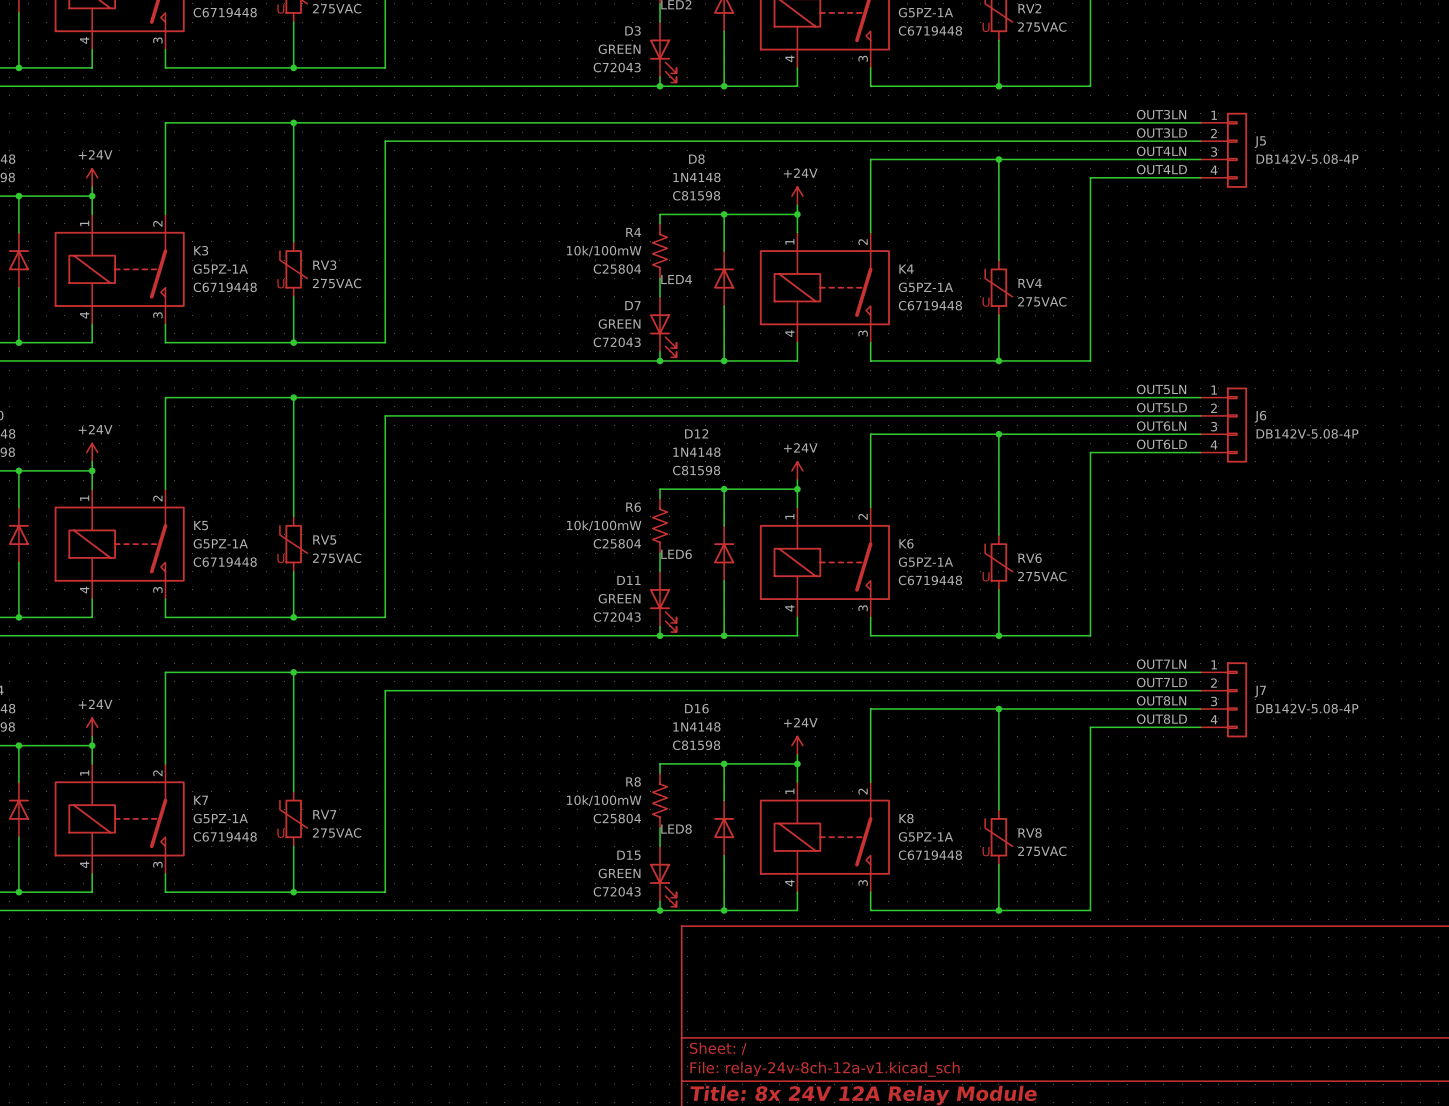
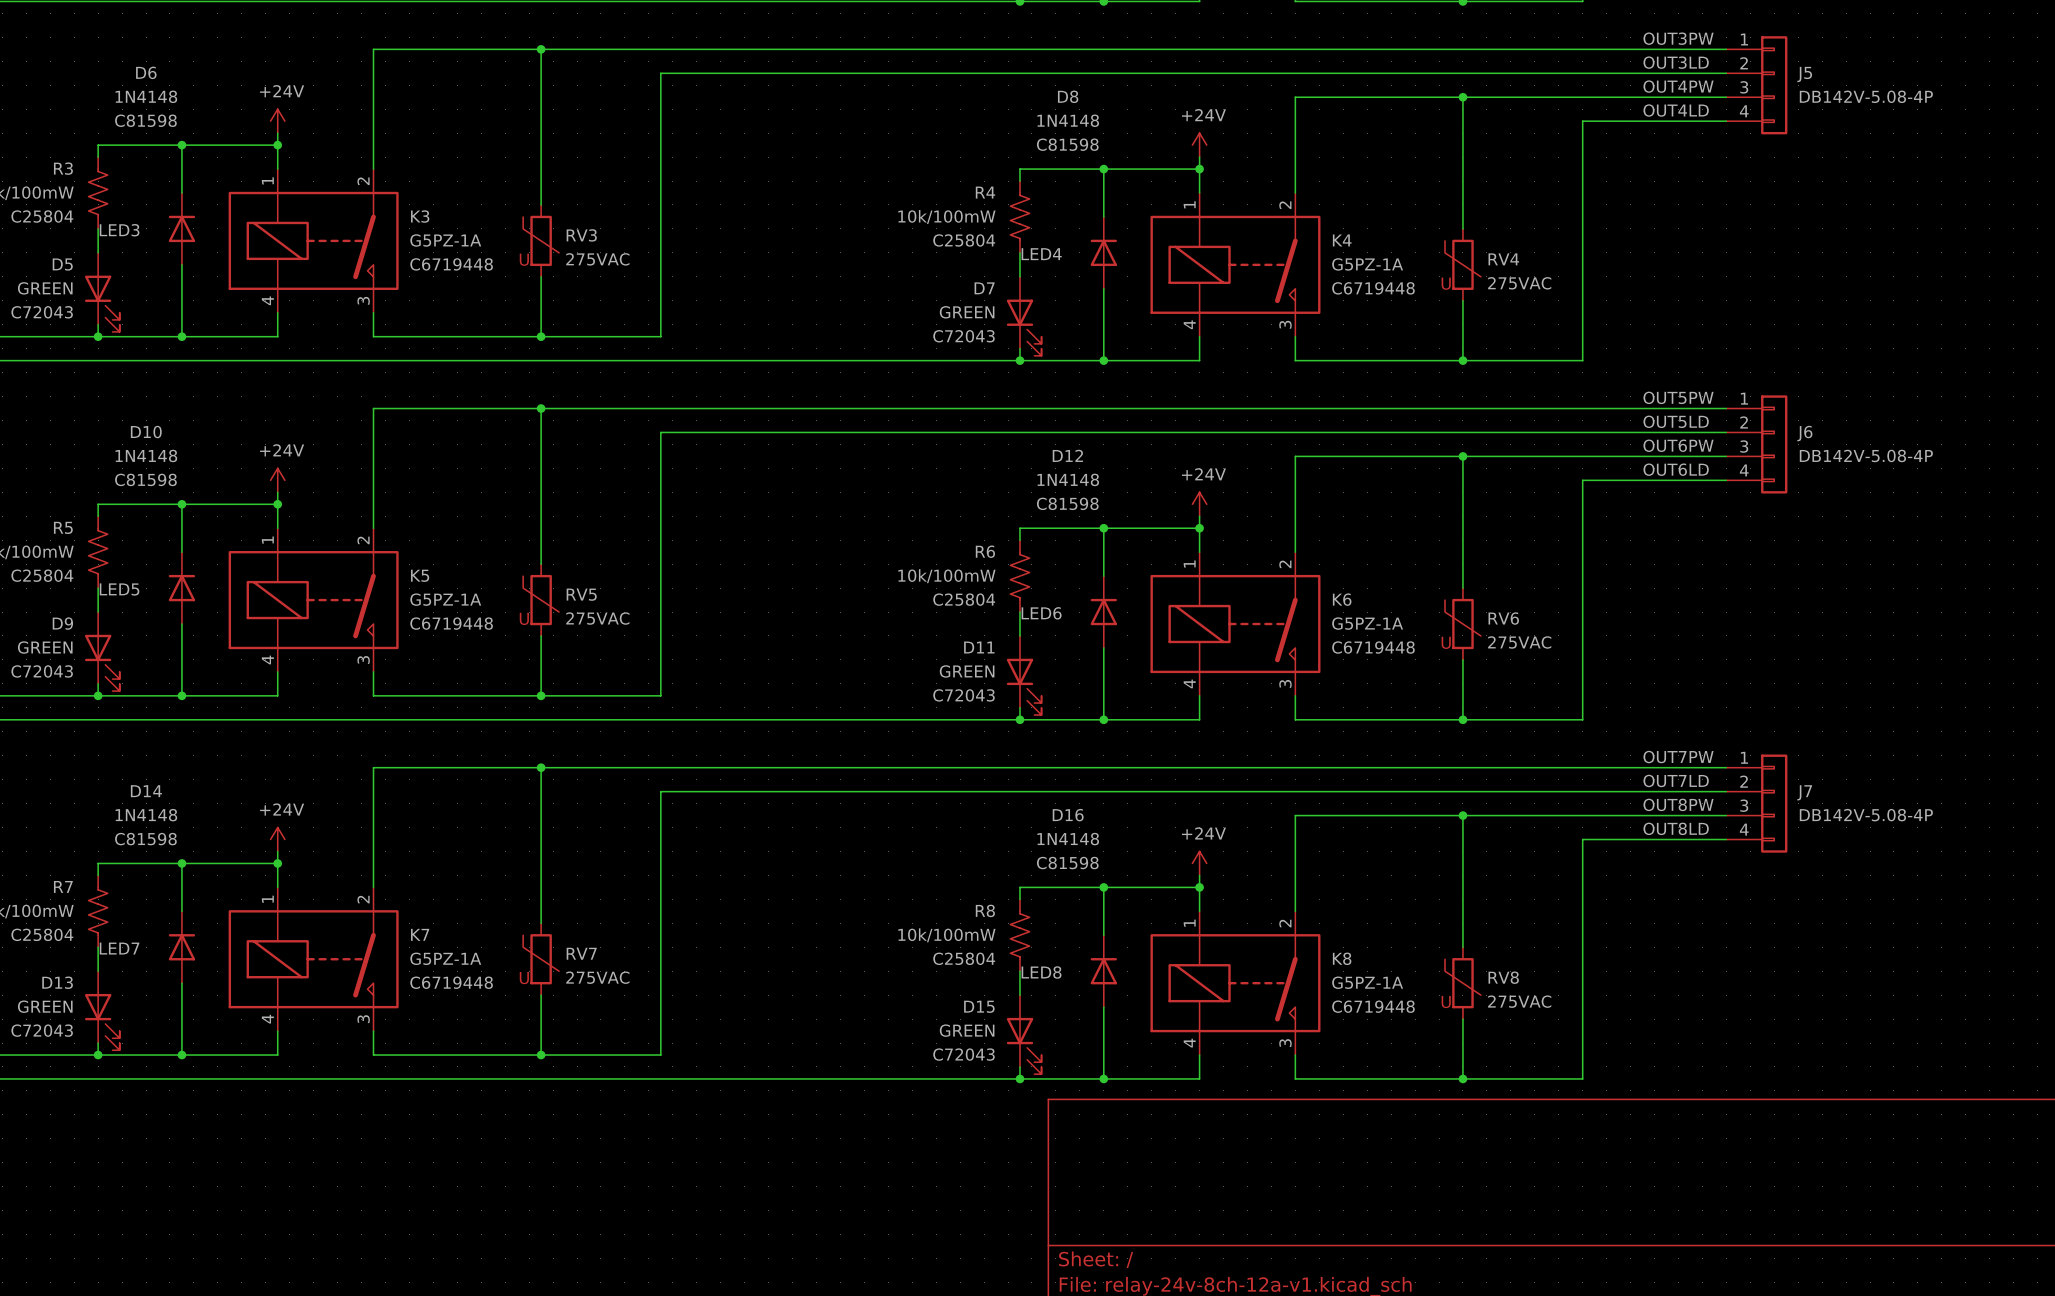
label: OUT3LN (1161, 114) -> OUT3PW (1678, 38)
label: OUT4LN (1161, 151) -> OUT4PW (1678, 86)
label: OUT5LN (1161, 389) -> OUT5PW (1678, 397)
label: OUT6LN (1161, 426) -> OUT6PW (1678, 445)
label: OUT7LN (1161, 664) -> OUT7PW (1678, 757)
label: OUT8LN (1161, 700) -> OUT8PW (1678, 804)

